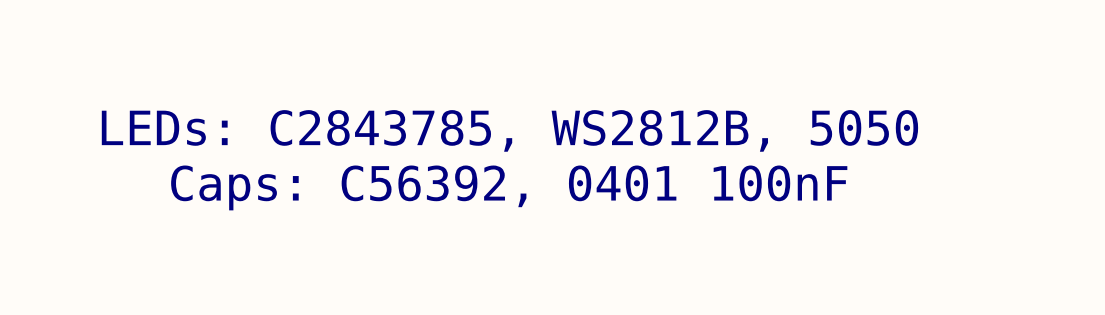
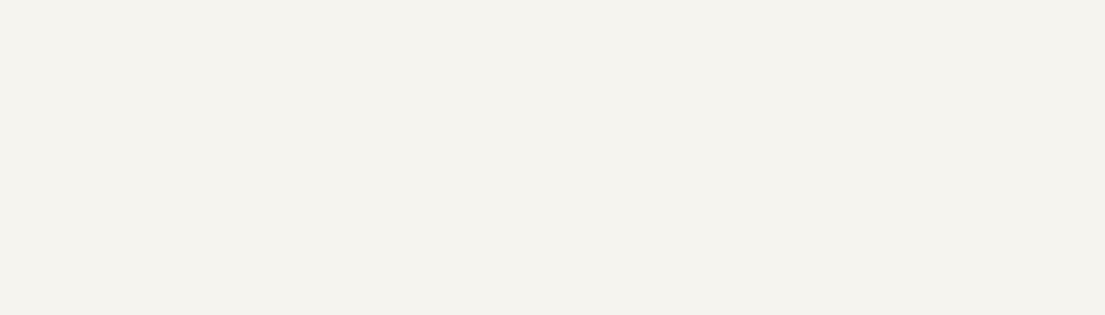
text: LEDs: C2843785, WS2812B, 5050 (509, 130) -> none
text: Caps: C56392, 0401 100nF (509, 187) -> none

